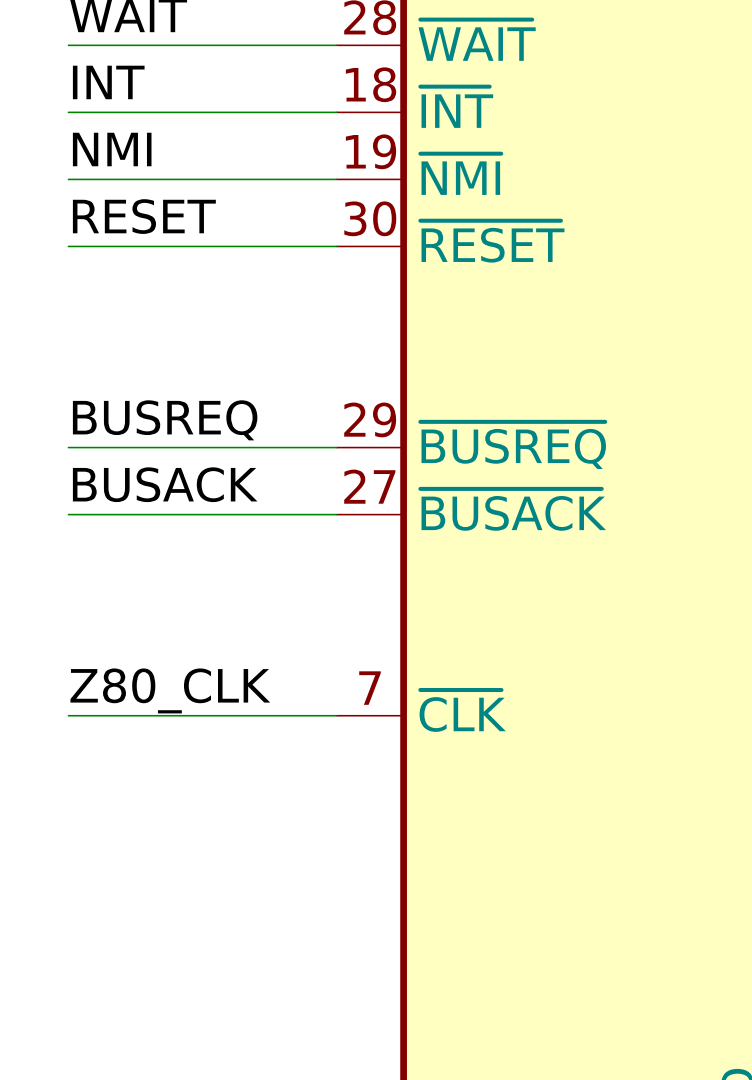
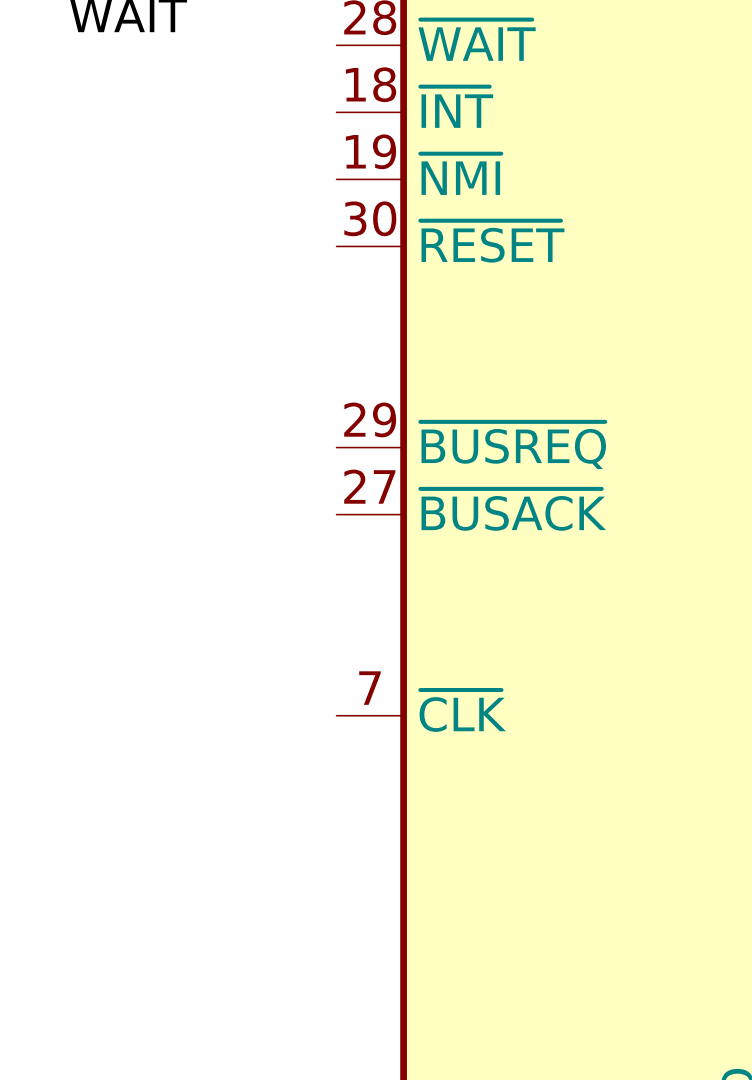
wire: (68, 45) (336, 45) -> none
label: INT (108, 82) -> none
wire: (68, 112) (336, 112) -> none
label: NMI (112, 149) -> none
wire: (68, 179) (336, 179) -> none
label: RESET (144, 216) -> none
wire: (68, 246) (336, 246) -> none
label: BUSREQ (165, 420) -> none
wire: (68, 447) (336, 447) -> none
label: BUSACK (165, 484) -> none
wire: (68, 514) (336, 514) -> none
label: Z80_CLK (170, 690) -> none
wire: (68, 715) (336, 715) -> none

